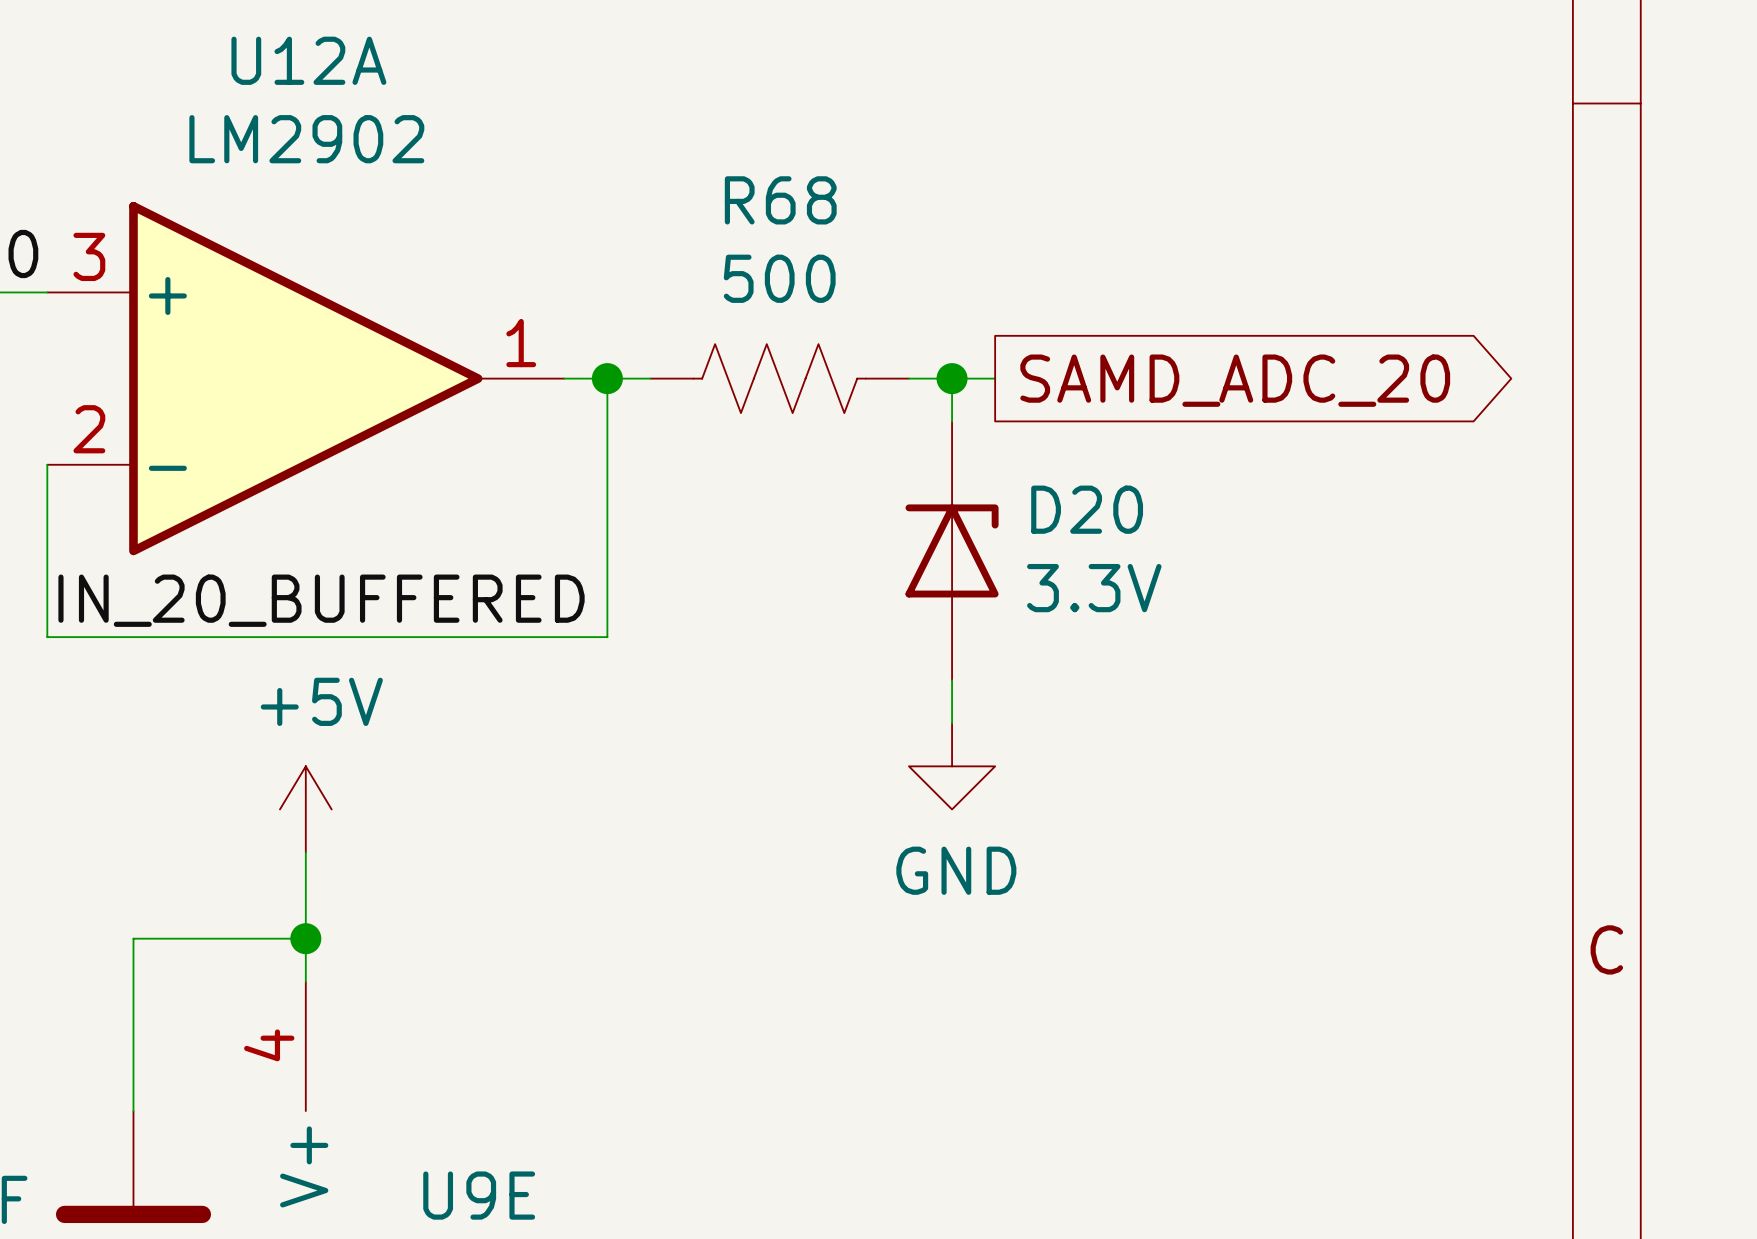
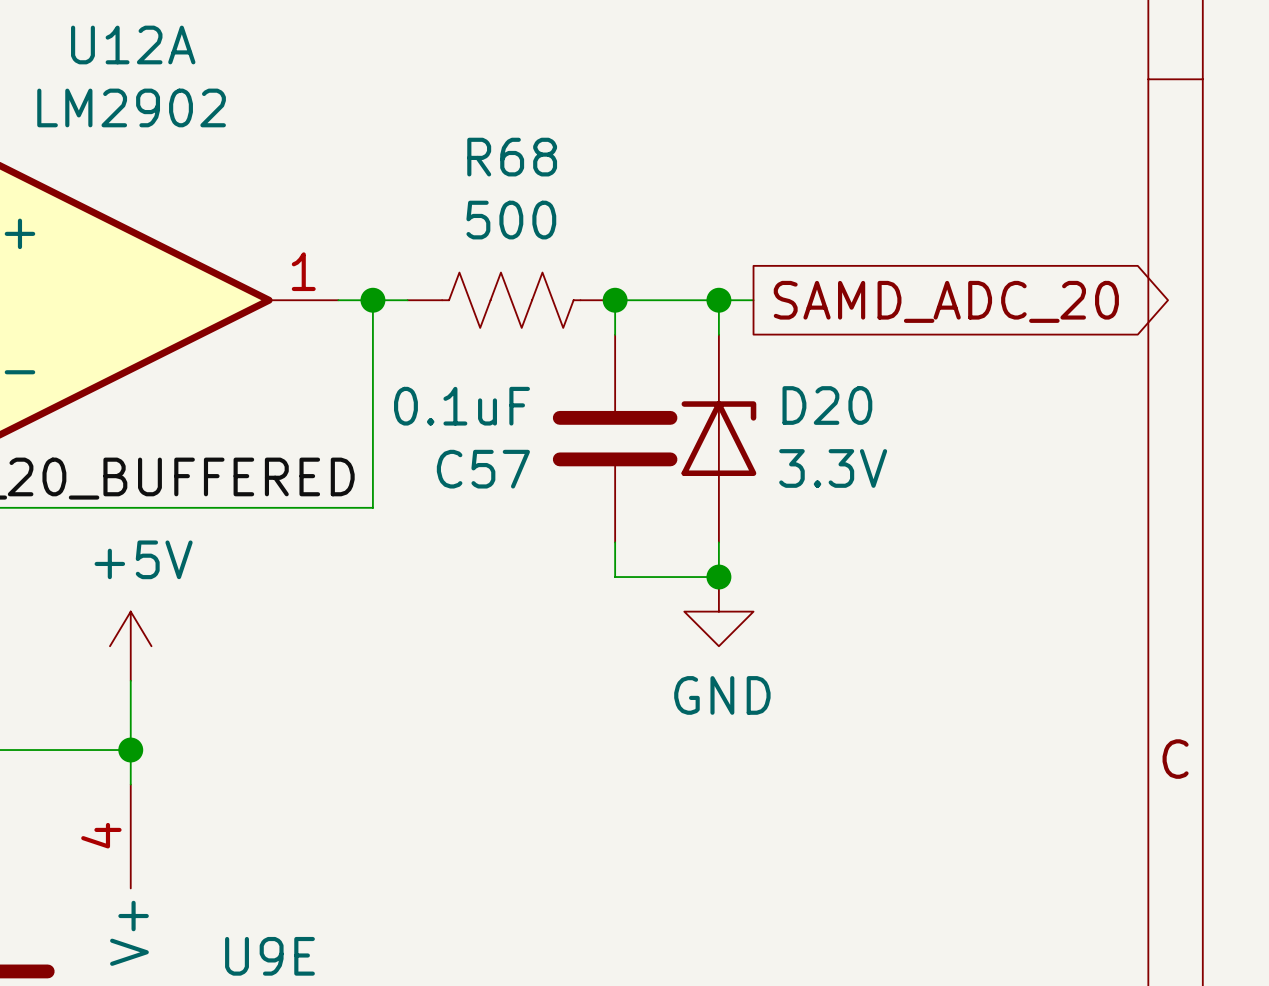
junction: none -> (615, 300)
wire: (952, 378) (952, 421) -> (615, 300) (615, 334)
junction: (952, 378) -> none
wire: none -> (684, 300) (753, 300)
junction: none -> (718, 300)
global label position: SAMD_ADC_20 (1235, 380) -> SAMD_ADC_20 (946, 301)
C57: none -> 0.1uF (615, 438)
D20 position: (952, 550) -> (718, 438)
wire: none -> (615, 542) (615, 577) (718, 577) (718, 542)
wire: (952, 680) (952, 723) -> (718, 300) (718, 334)
junction: none -> (718, 577)
power symbol position: GND (952, 766) -> GND (718, 611)

